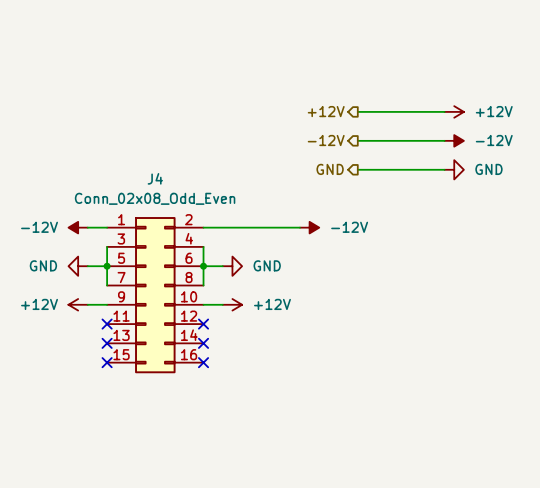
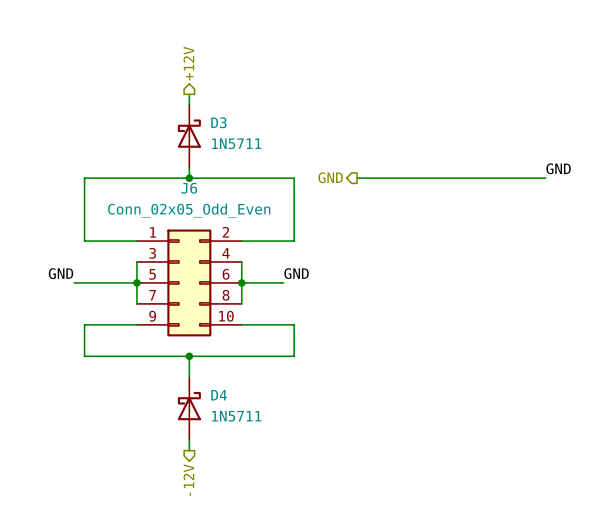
hierarchical label: none -> +12V (188, 63)
wire: none -> (189, 94) (189, 104)
hierarchical label: +12V (326, 111) -> none
wire: (357, 111) (444, 111) -> none
power symbol: +12V (454, 111) -> none
D3: none -> 1N5711 (189, 136)
hierarchical label: -12V (326, 140) -> none
wire: (357, 140) (444, 140) -> none
power symbol: -12V (454, 140) -> none
wire: none -> (189, 167) (189, 178)
label: none -> GND (558, 168)
junction: none -> (189, 178)
wire: none -> (357, 178) (409, 178)
hierarchical label position: GND (330, 169) -> GND (330, 177)
wire: none -> (503, 178) (545, 178)
power symbol: GND (454, 169) -> none
power symbol: -12V (78, 227) -> none
wire: (251, 227) (299, 227) -> (294, 241) (294, 178) (84, 178) (84, 241) (115, 241)
power symbol: -12V (309, 227) -> none
label: none -> GND (61, 273)
label: none -> GND (296, 273)
wire: none -> (74, 282) (115, 282)
power symbol: GND (78, 266) -> none
J6: none -> Conn_02x05_Odd_Even (189, 282)
power symbol: GND (232, 266) -> none
J4: Conn_02x08_Odd_Even (155, 295) -> none
power symbol: +12V (78, 304) -> none
wire: none -> (115, 324) (84, 324) (84, 356) (294, 356) (294, 324) (262, 324)
power symbol: +12V (232, 304) -> none
no-connect mark: (107, 324) -> none
no-connect mark: (203, 324) -> none
junction: none -> (189, 356)
no-connect mark: (107, 343) -> none
no-connect mark: (203, 343) -> none
no-connect mark: (107, 362) -> none
no-connect mark: (203, 362) -> none
D4: none -> 1N5711 (189, 408)
wire: none -> (189, 440) (189, 450)
hierarchical label: none -> -12V (188, 480)

